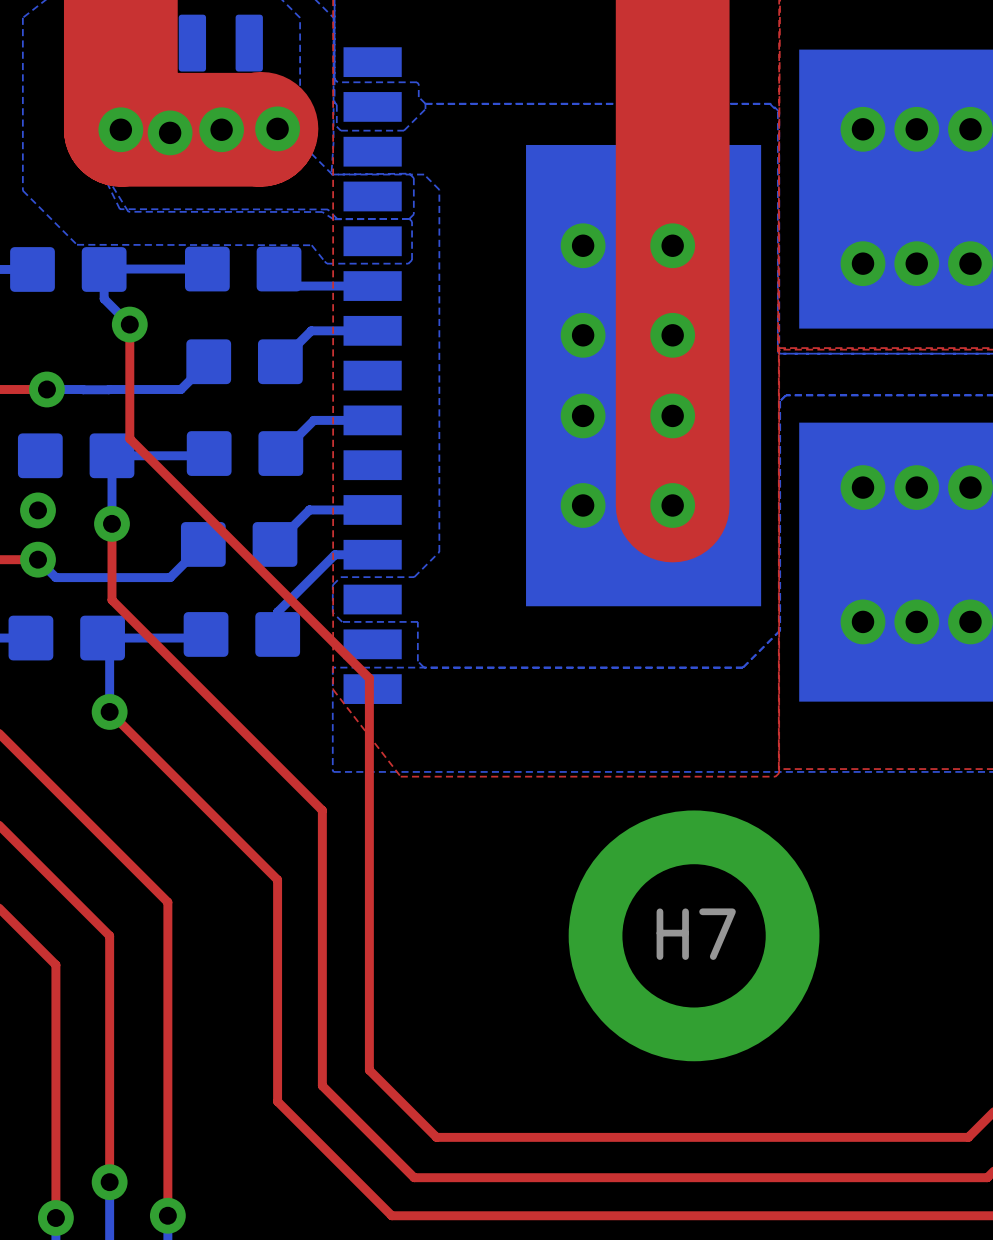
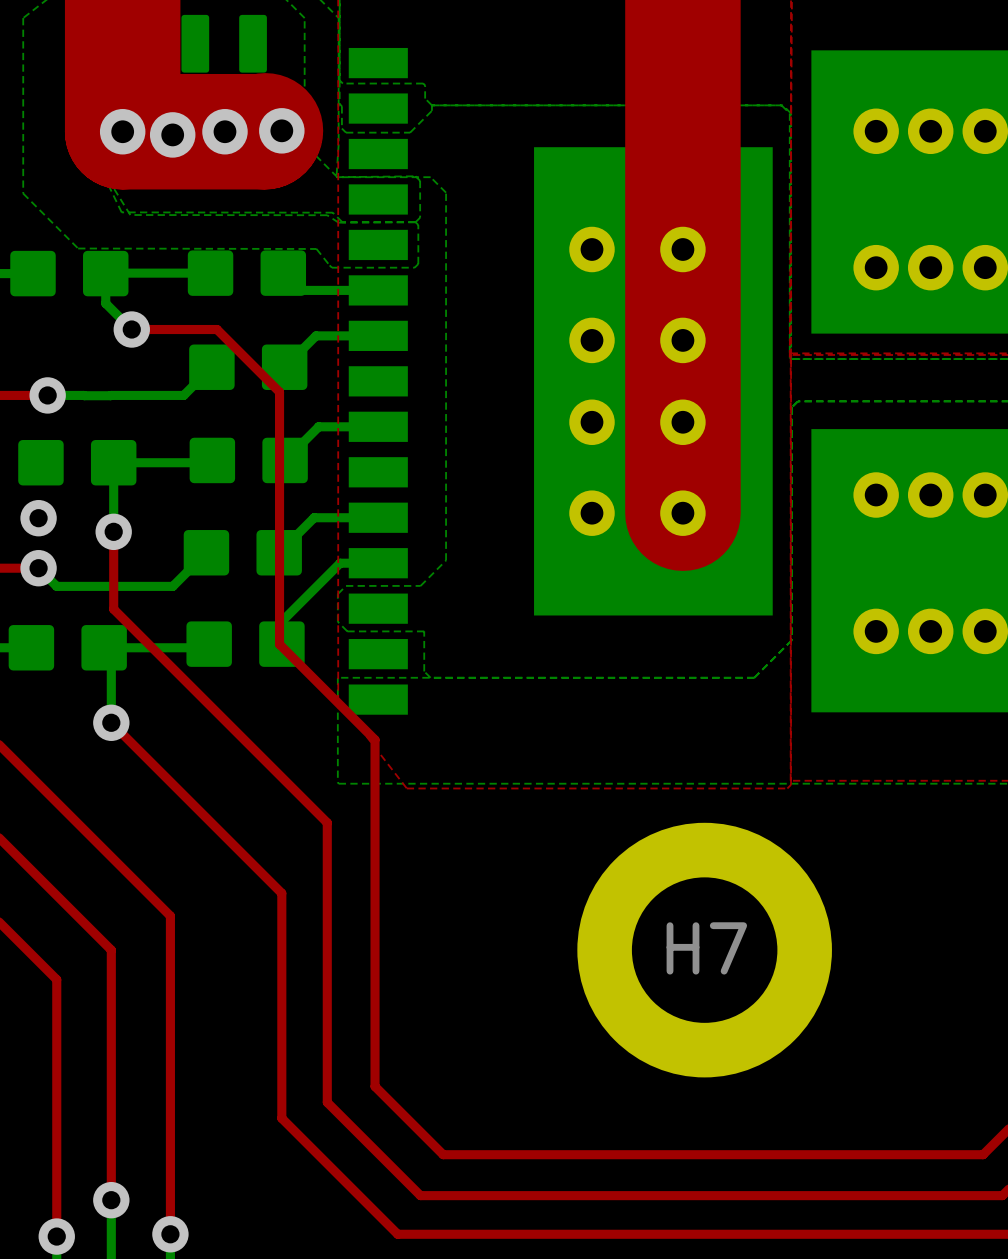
top track: (129, 324) (129, 438) (369, 678) (369, 728) -> (131, 329) (217, 329) (279, 392) (279, 644) (375, 739)

